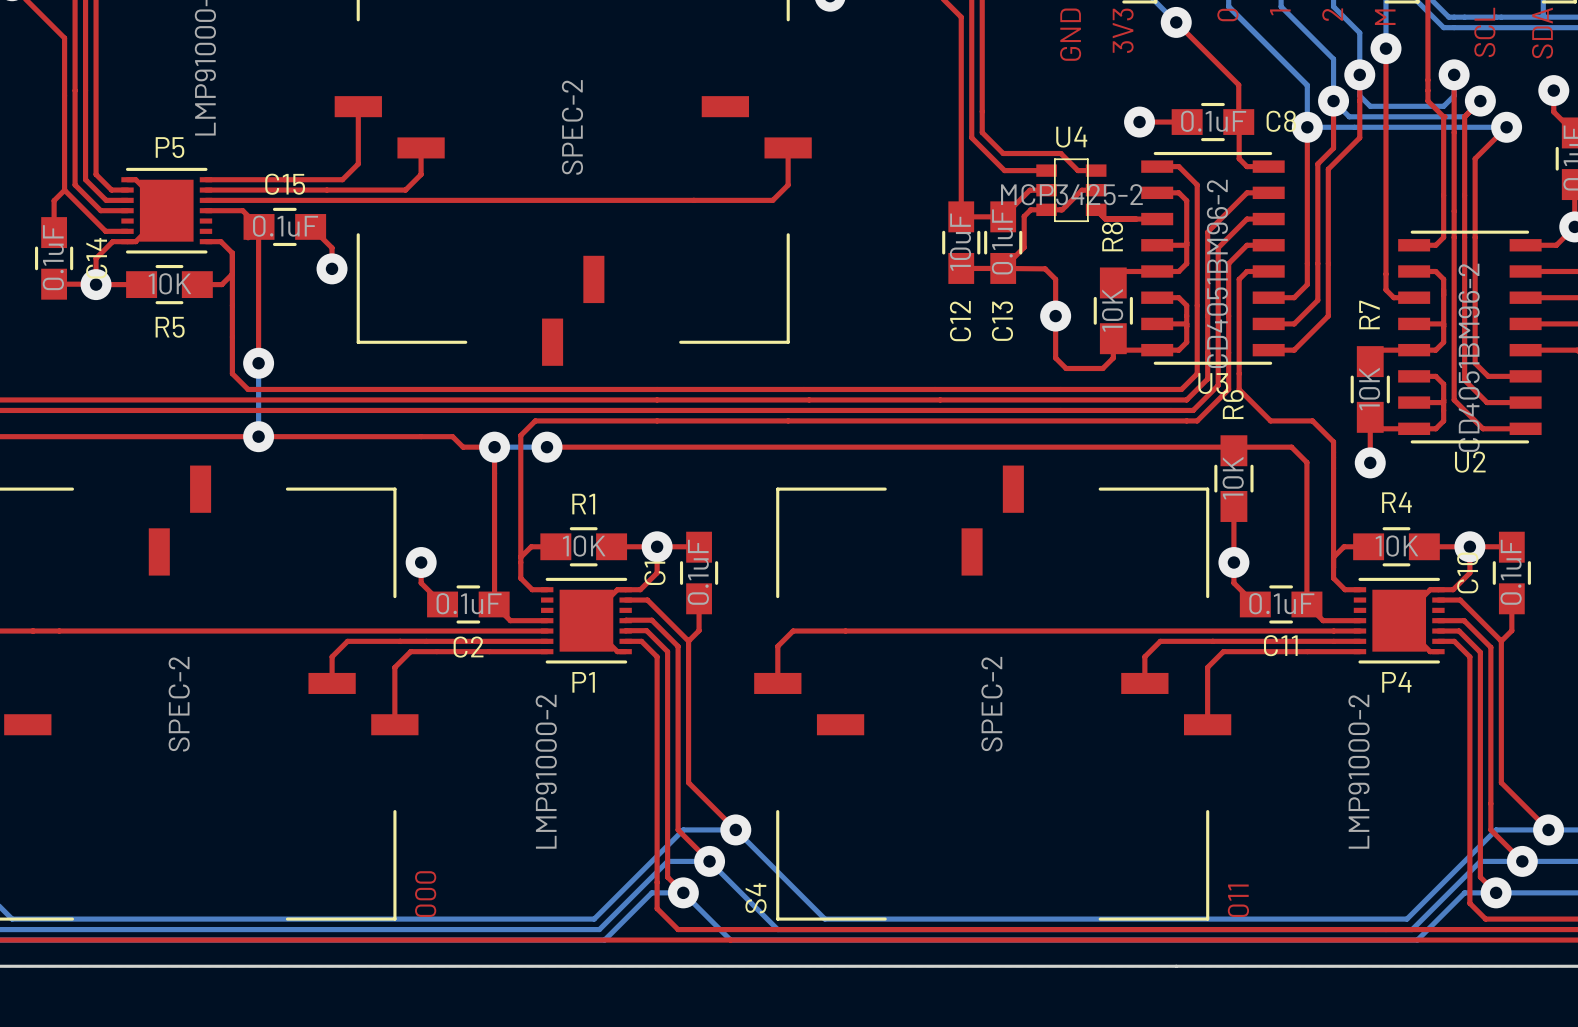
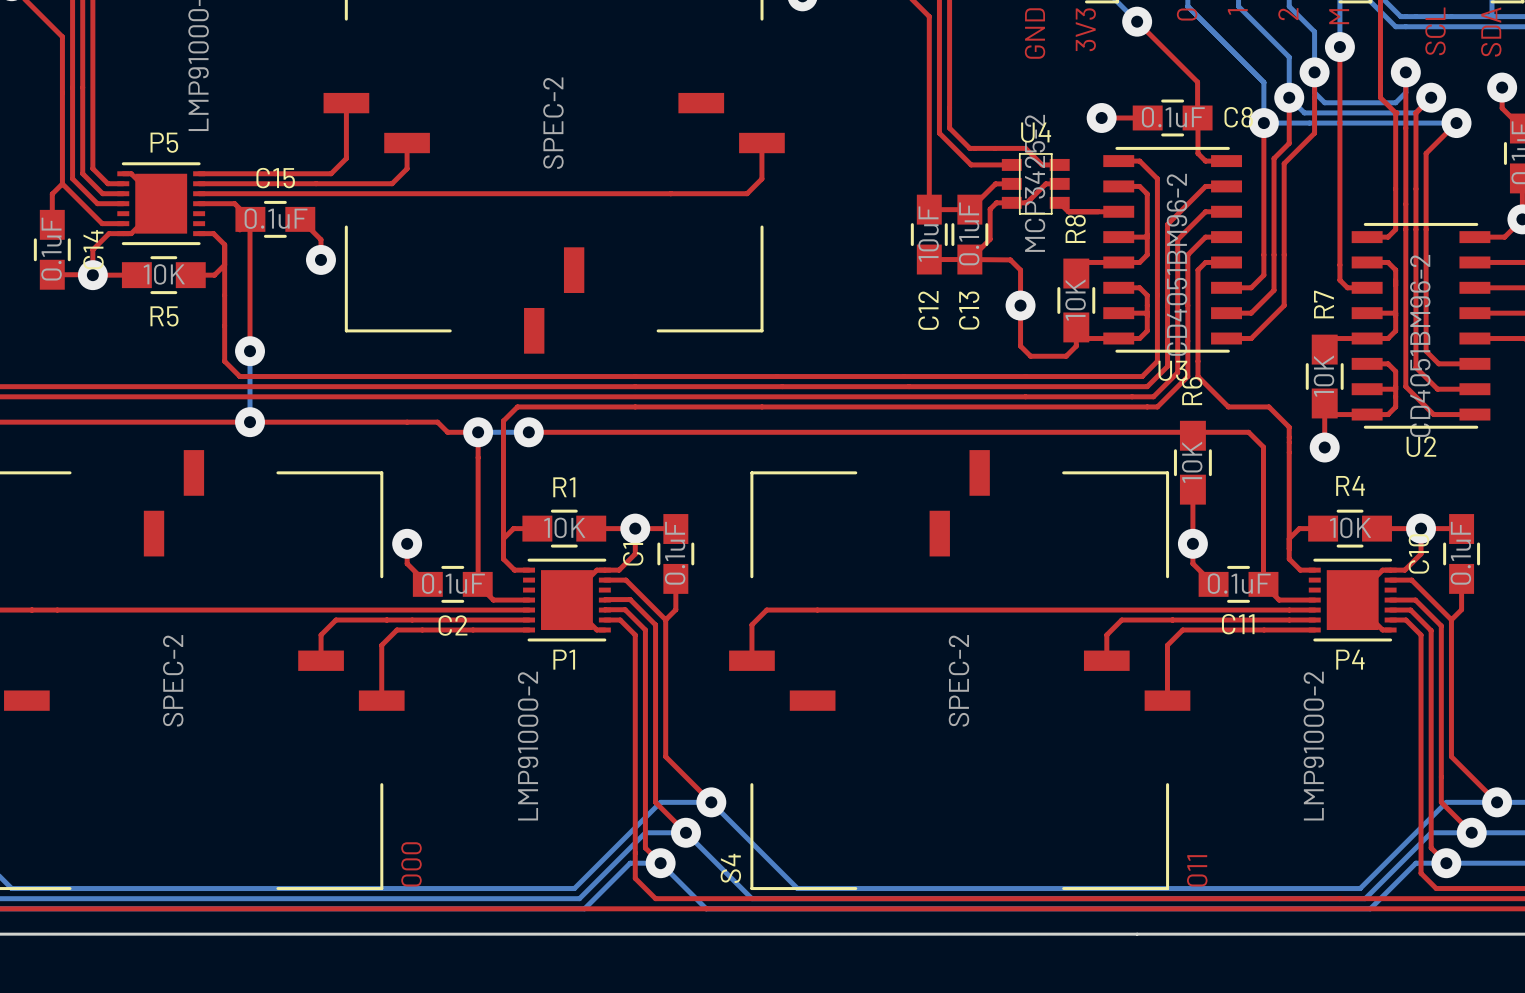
U4 value rotation: 0° (1071, 194) -> 90° counterclockwise (1035, 183)

